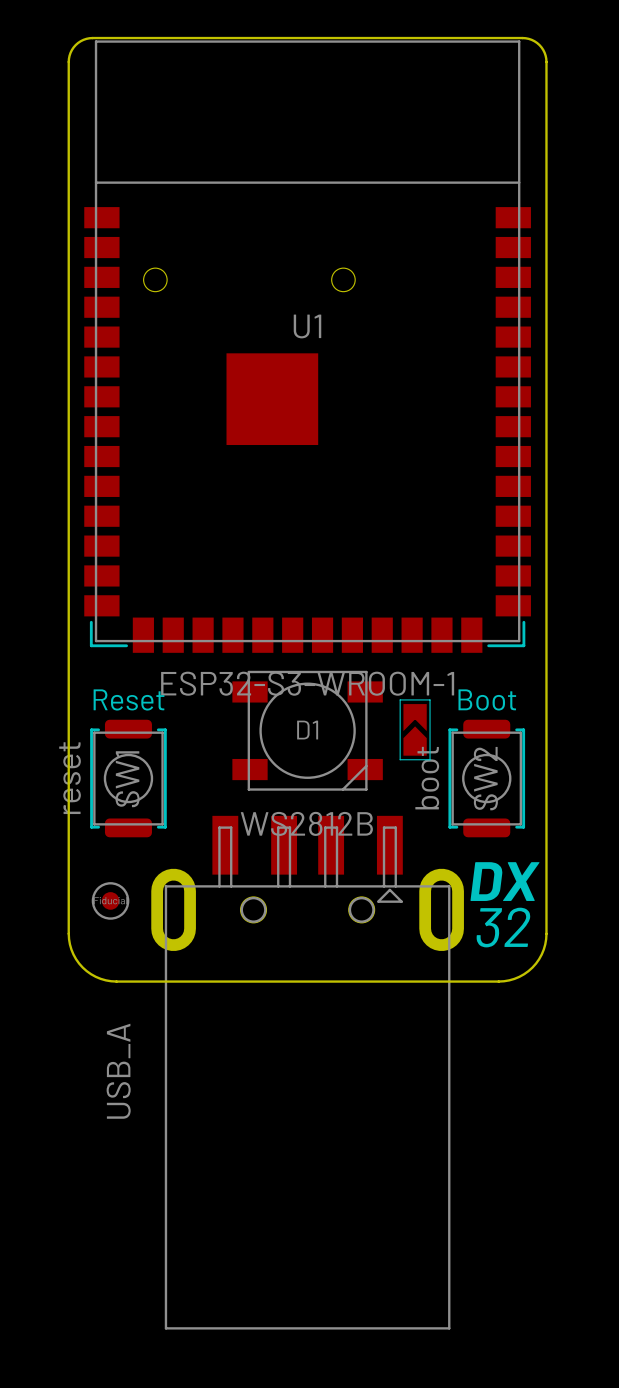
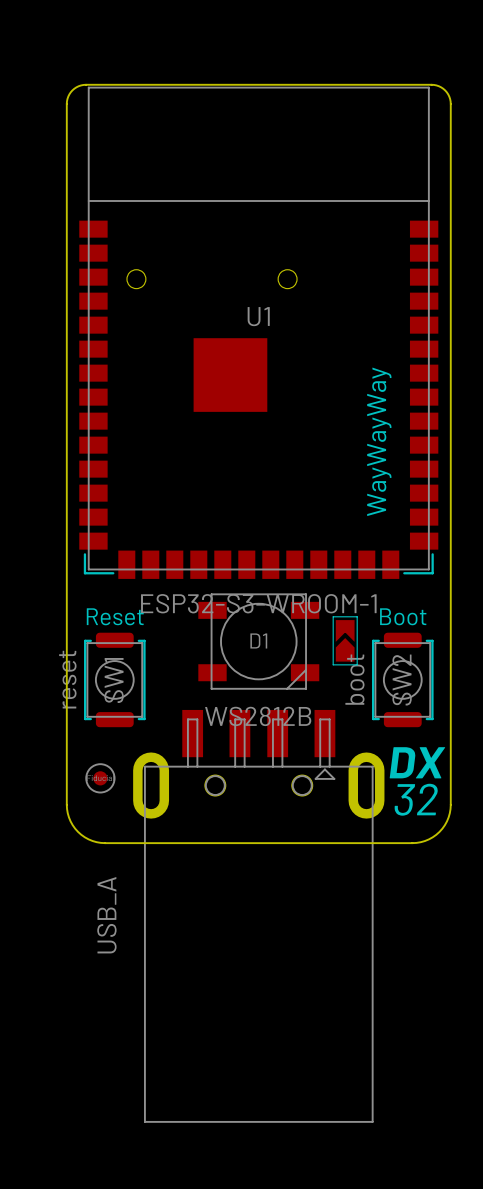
text: none -> WayWayWay (379, 441)

